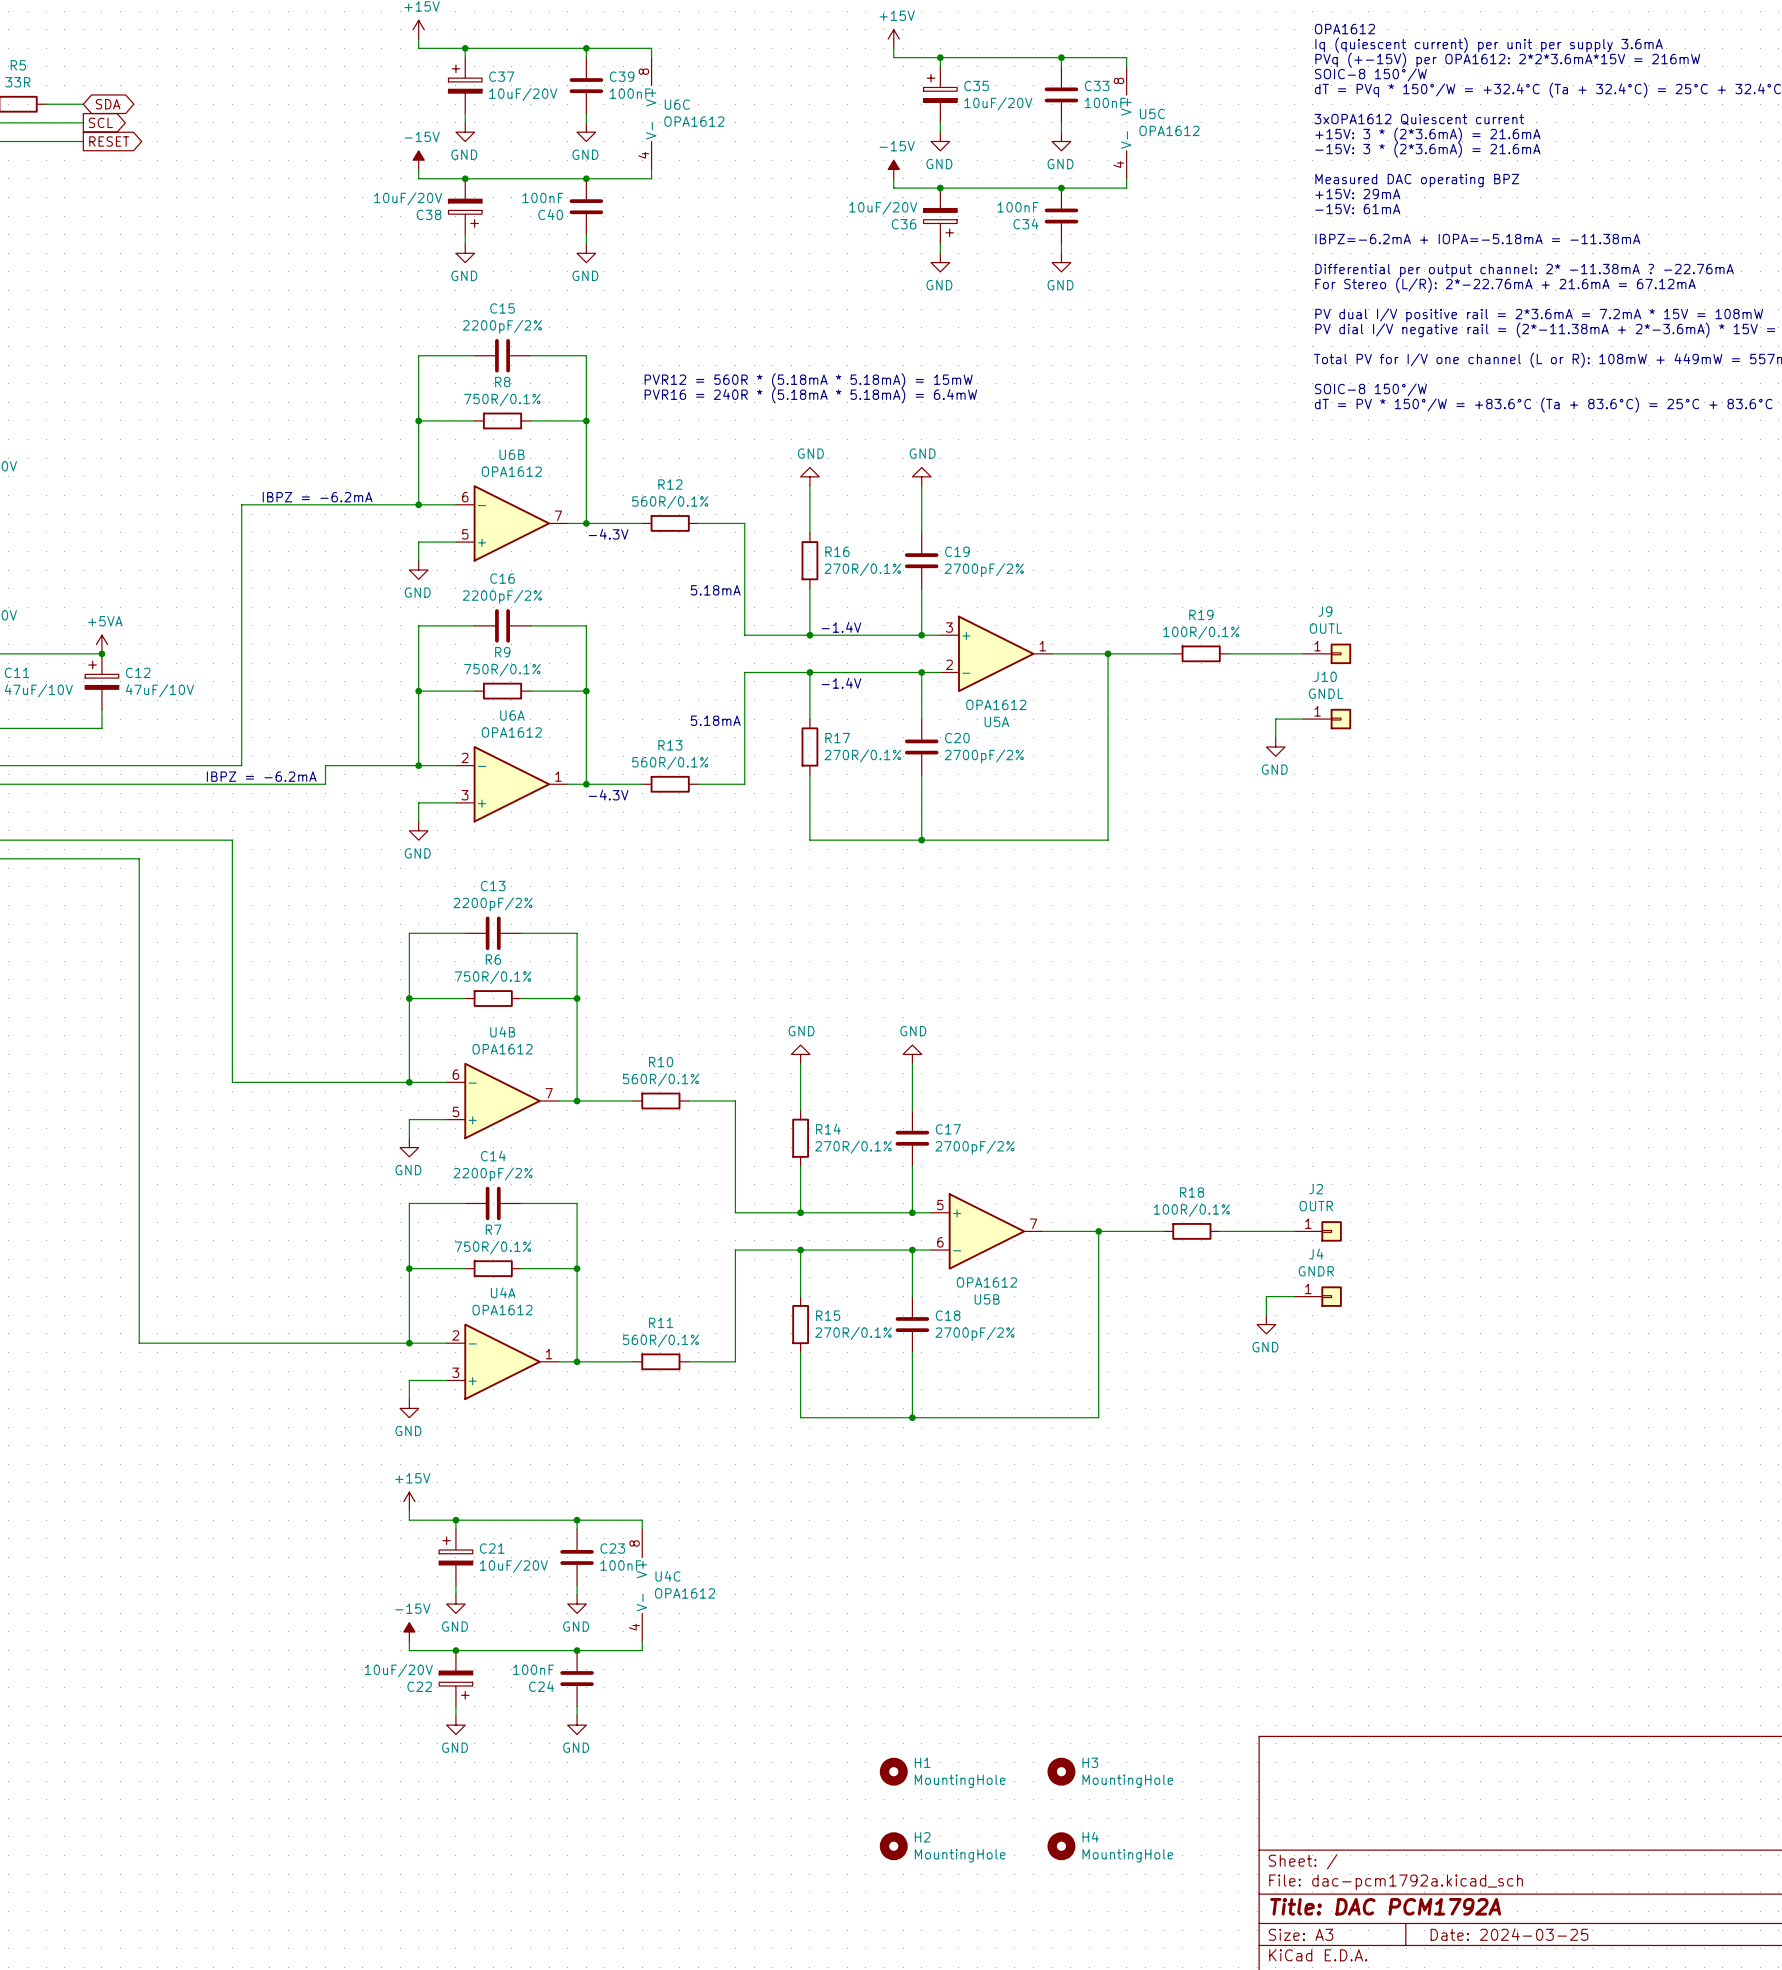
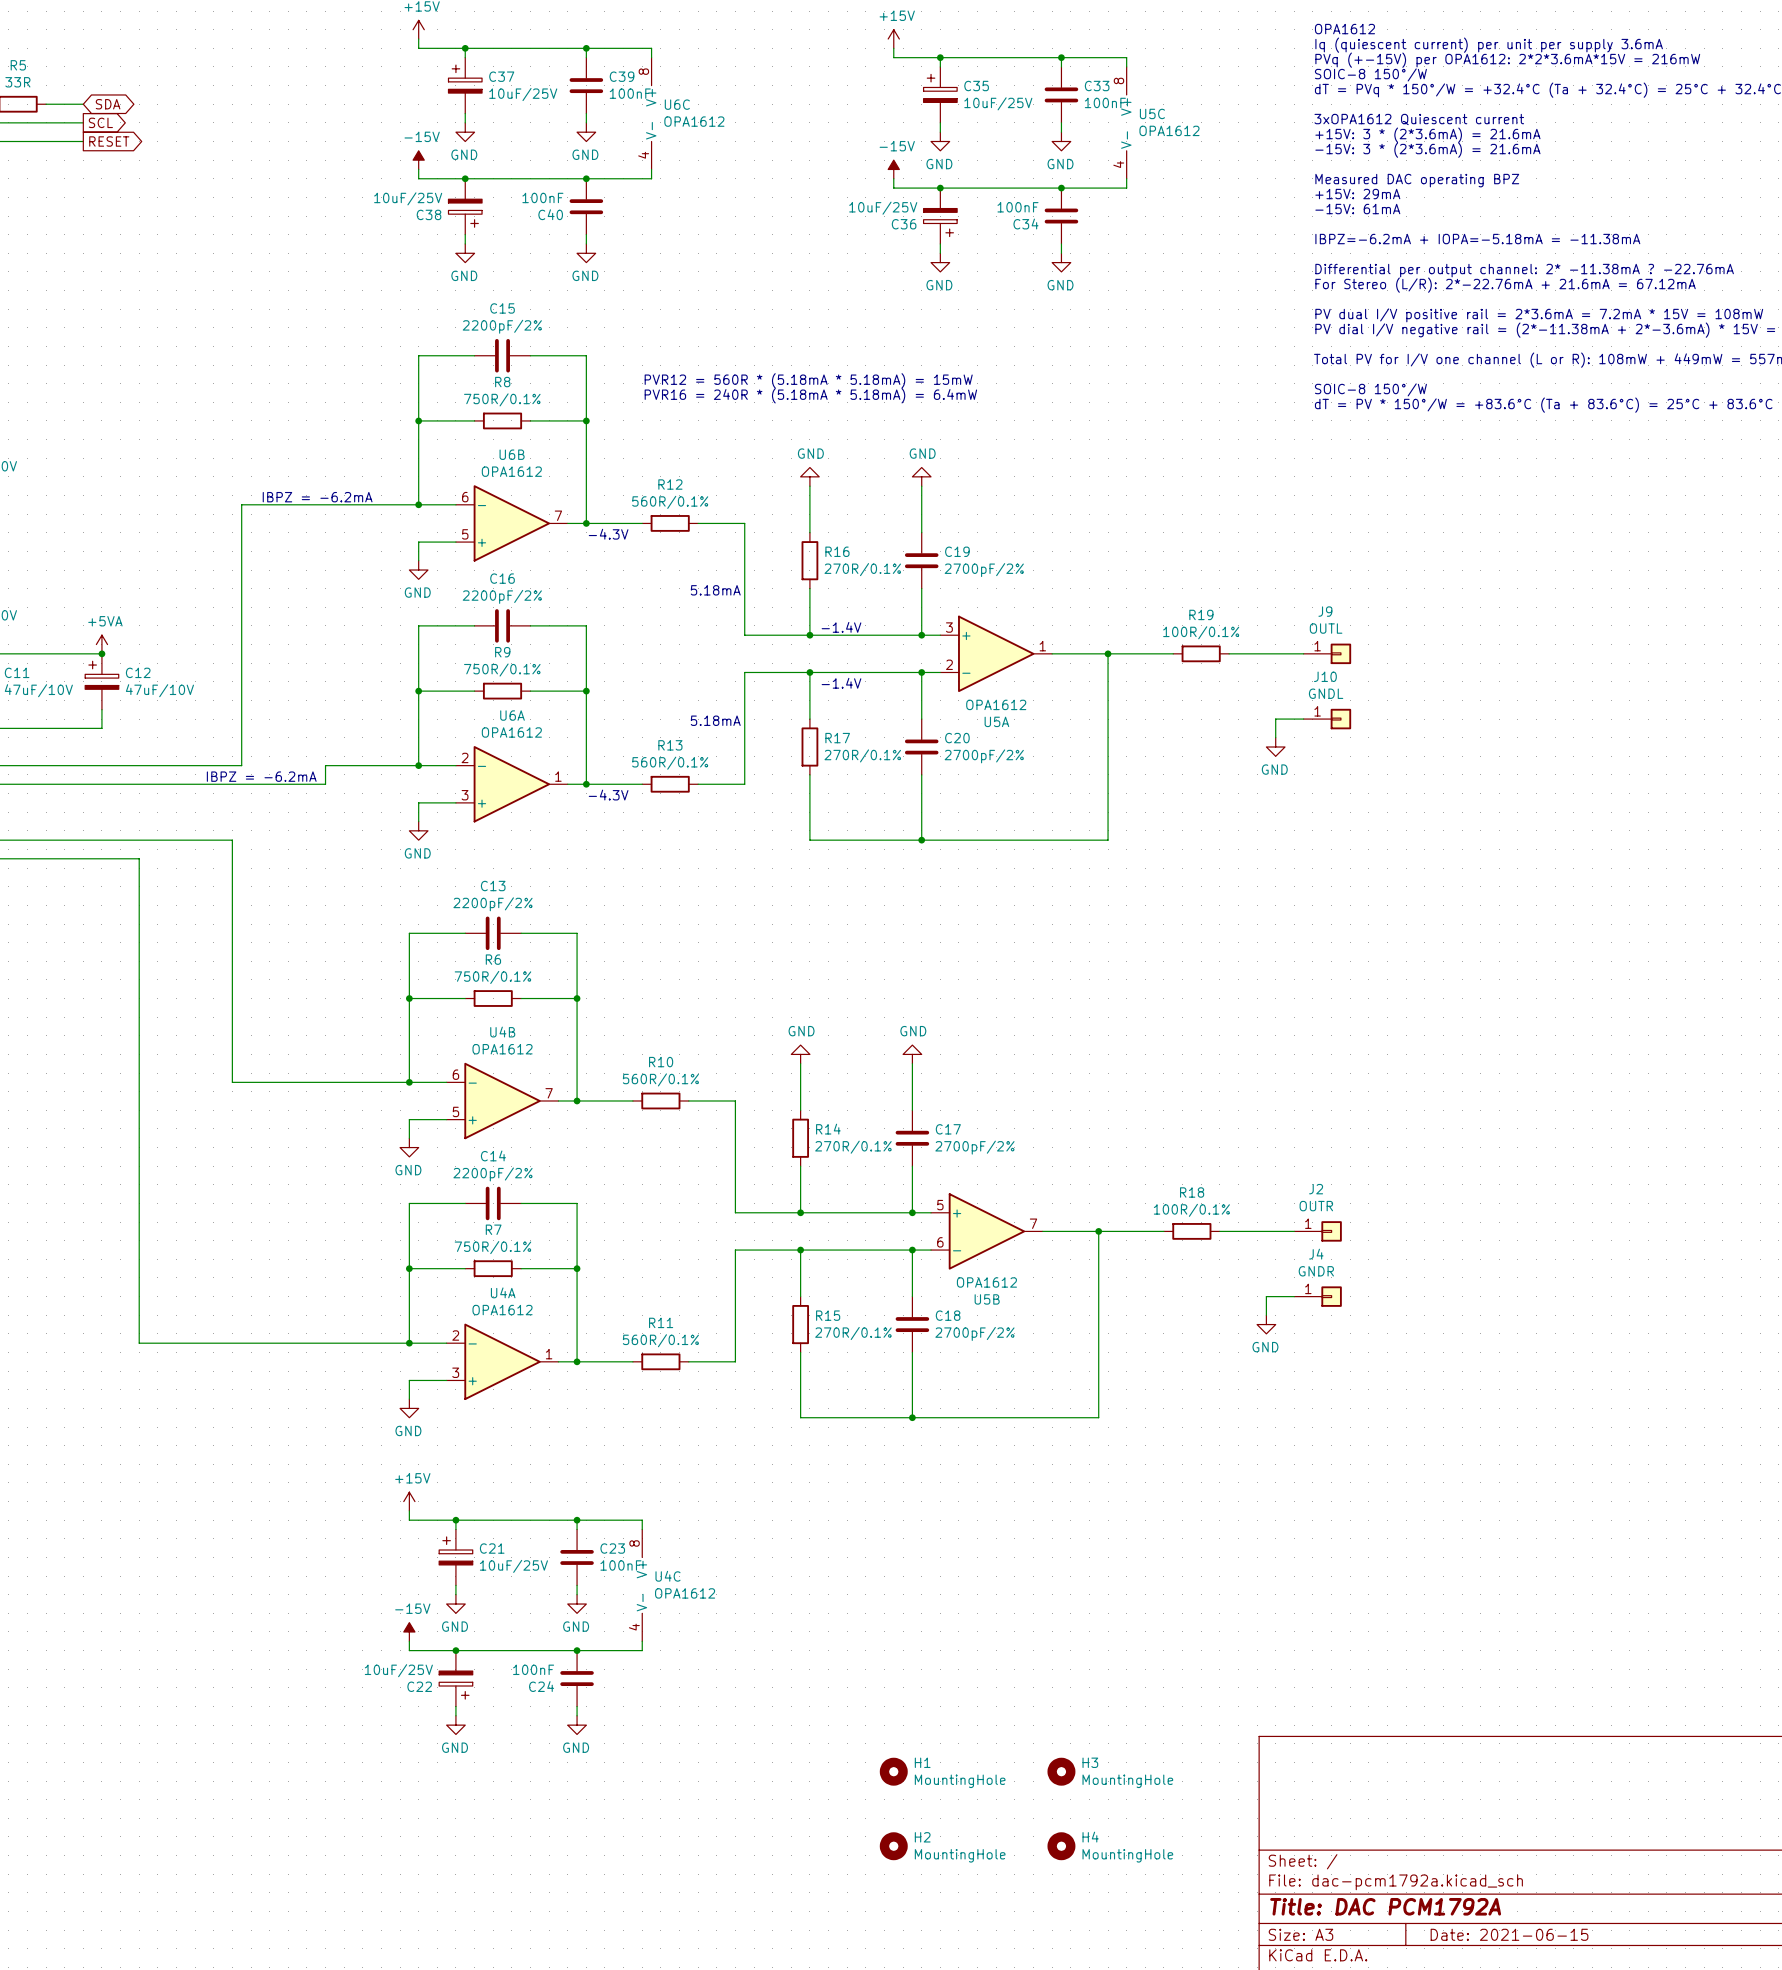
C37 value: 10uF/20V (523, 94) -> 10uF/25V (523, 94)
C35 value: 10uF/20V (998, 103) -> 10uF/25V (998, 103)
C38 value: 10uF/20V (408, 198) -> 10uF/25V (408, 198)
C36 value: 10uF/20V (883, 208) -> 10uF/25V (883, 208)
C21 value: 10uF/20V (513, 1566) -> 10uF/25V (513, 1566)
C22 value: 10uF/20V (398, 1670) -> 10uF/25V (398, 1670)
title block: Date: 2024-03-25 (1509, 1934) -> Date: 2021-06-15 (1509, 1934)

